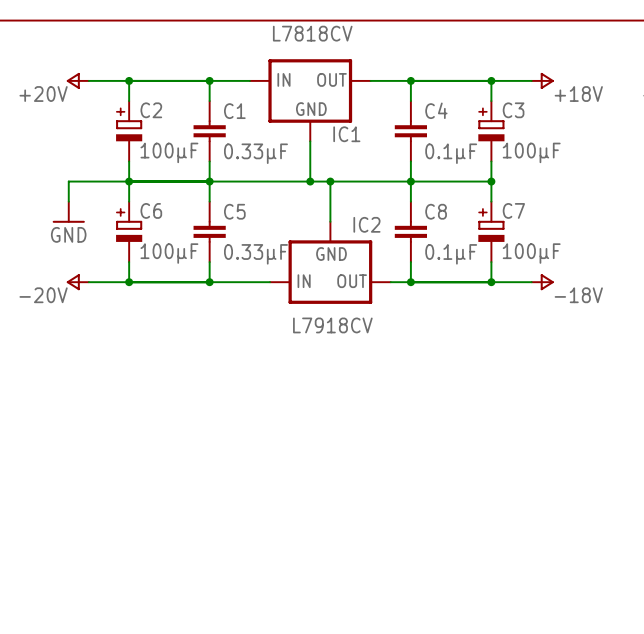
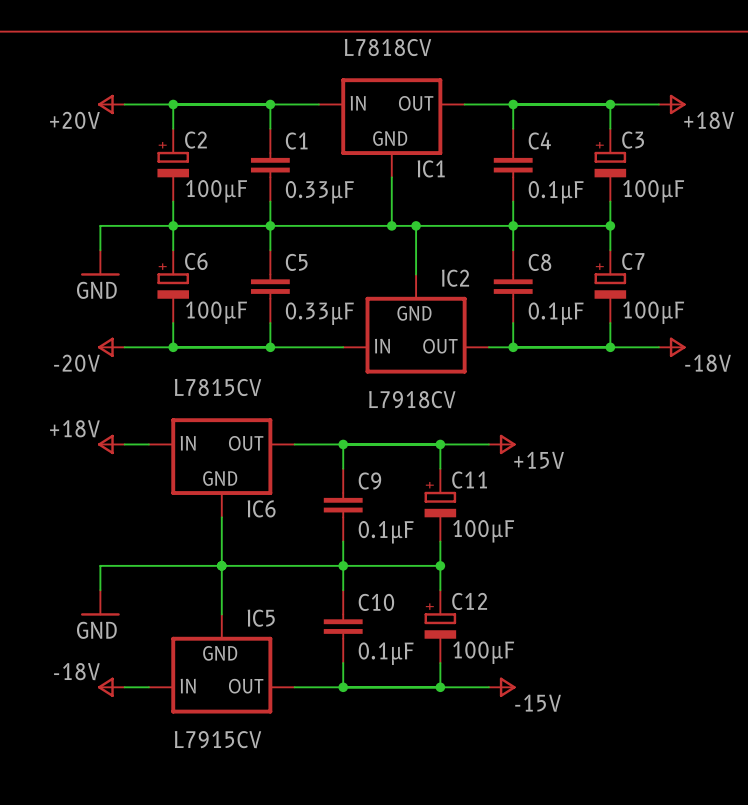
power symbol: none -> +18V (111, 444)
wire: none -> (124, 444) (148, 444)
wire: none -> (294, 444) (488, 444)
wire: none -> (343, 444) (343, 468)
junction: none -> (343, 444)
wire: none -> (440, 444) (440, 468)
junction: none -> (440, 444)
power symbol: none -> +15V (502, 444)
IC6: none -> L7815CV (221, 467)
C9: none -> 0.1µF (343, 505)
C11: none -> 100µF (440, 505)
wire: none -> (221, 517) (221, 614)
wire: none -> (343, 541) (343, 590)
wire: none -> (440, 541) (440, 590)
junction: none -> (221, 565)
junction: none -> (343, 565)
wire: none -> (440, 565) (100, 565) (100, 590)
junction: none -> (440, 565)
power symbol: none -> GND (100, 602)
C10: none -> 0.1µF (343, 626)
C12: none -> 100µF (440, 626)
wire: none -> (343, 663) (343, 687)
wire: none -> (440, 663) (440, 687)
IC5: none -> L7915CV (221, 663)
power symbol: none -> -18V (111, 687)
wire: none -> (124, 687) (148, 687)
wire: none -> (294, 687) (488, 687)
junction: none -> (343, 687)
junction: none -> (440, 687)
power symbol: none -> -15V (502, 687)

